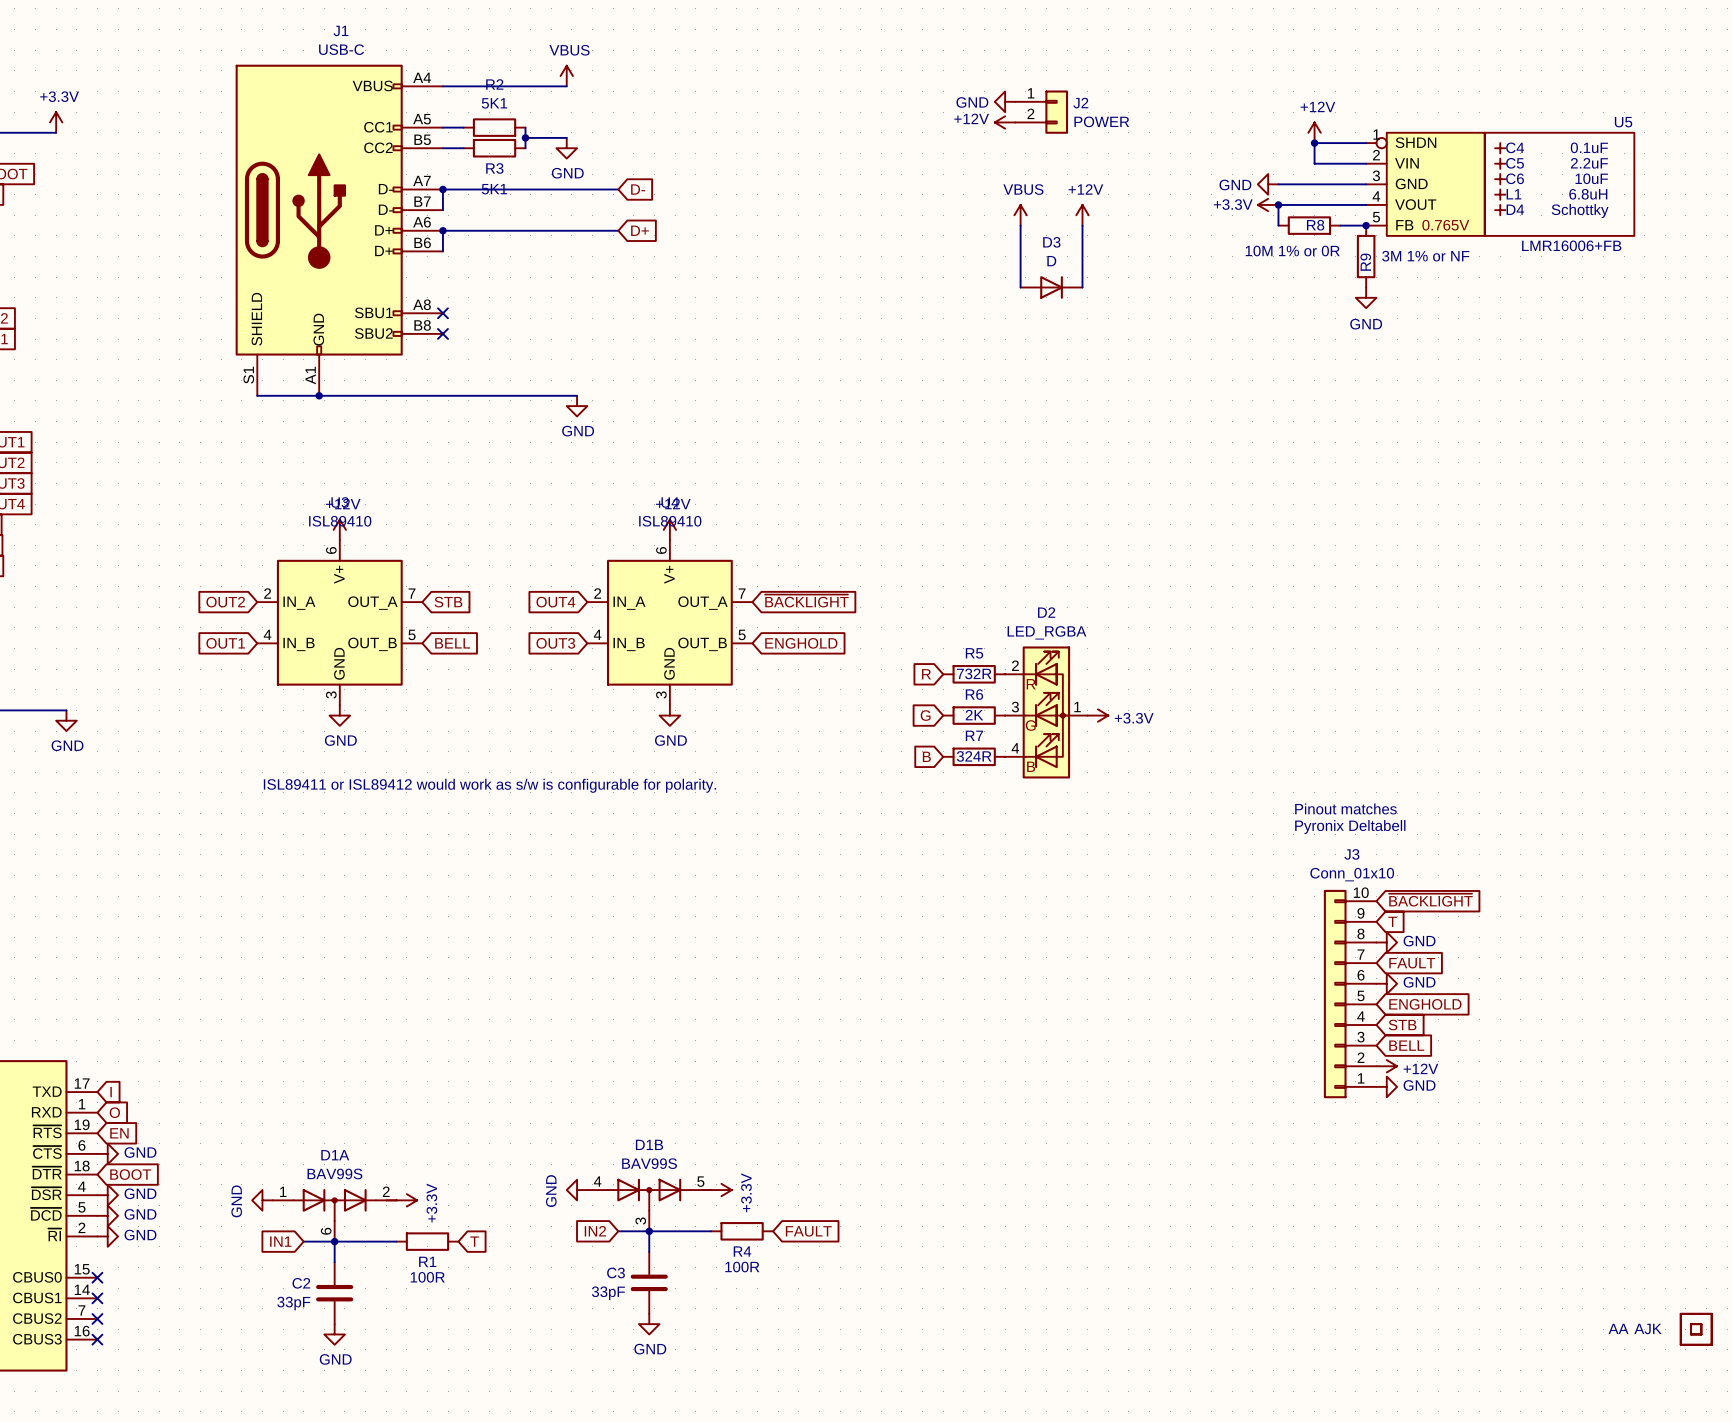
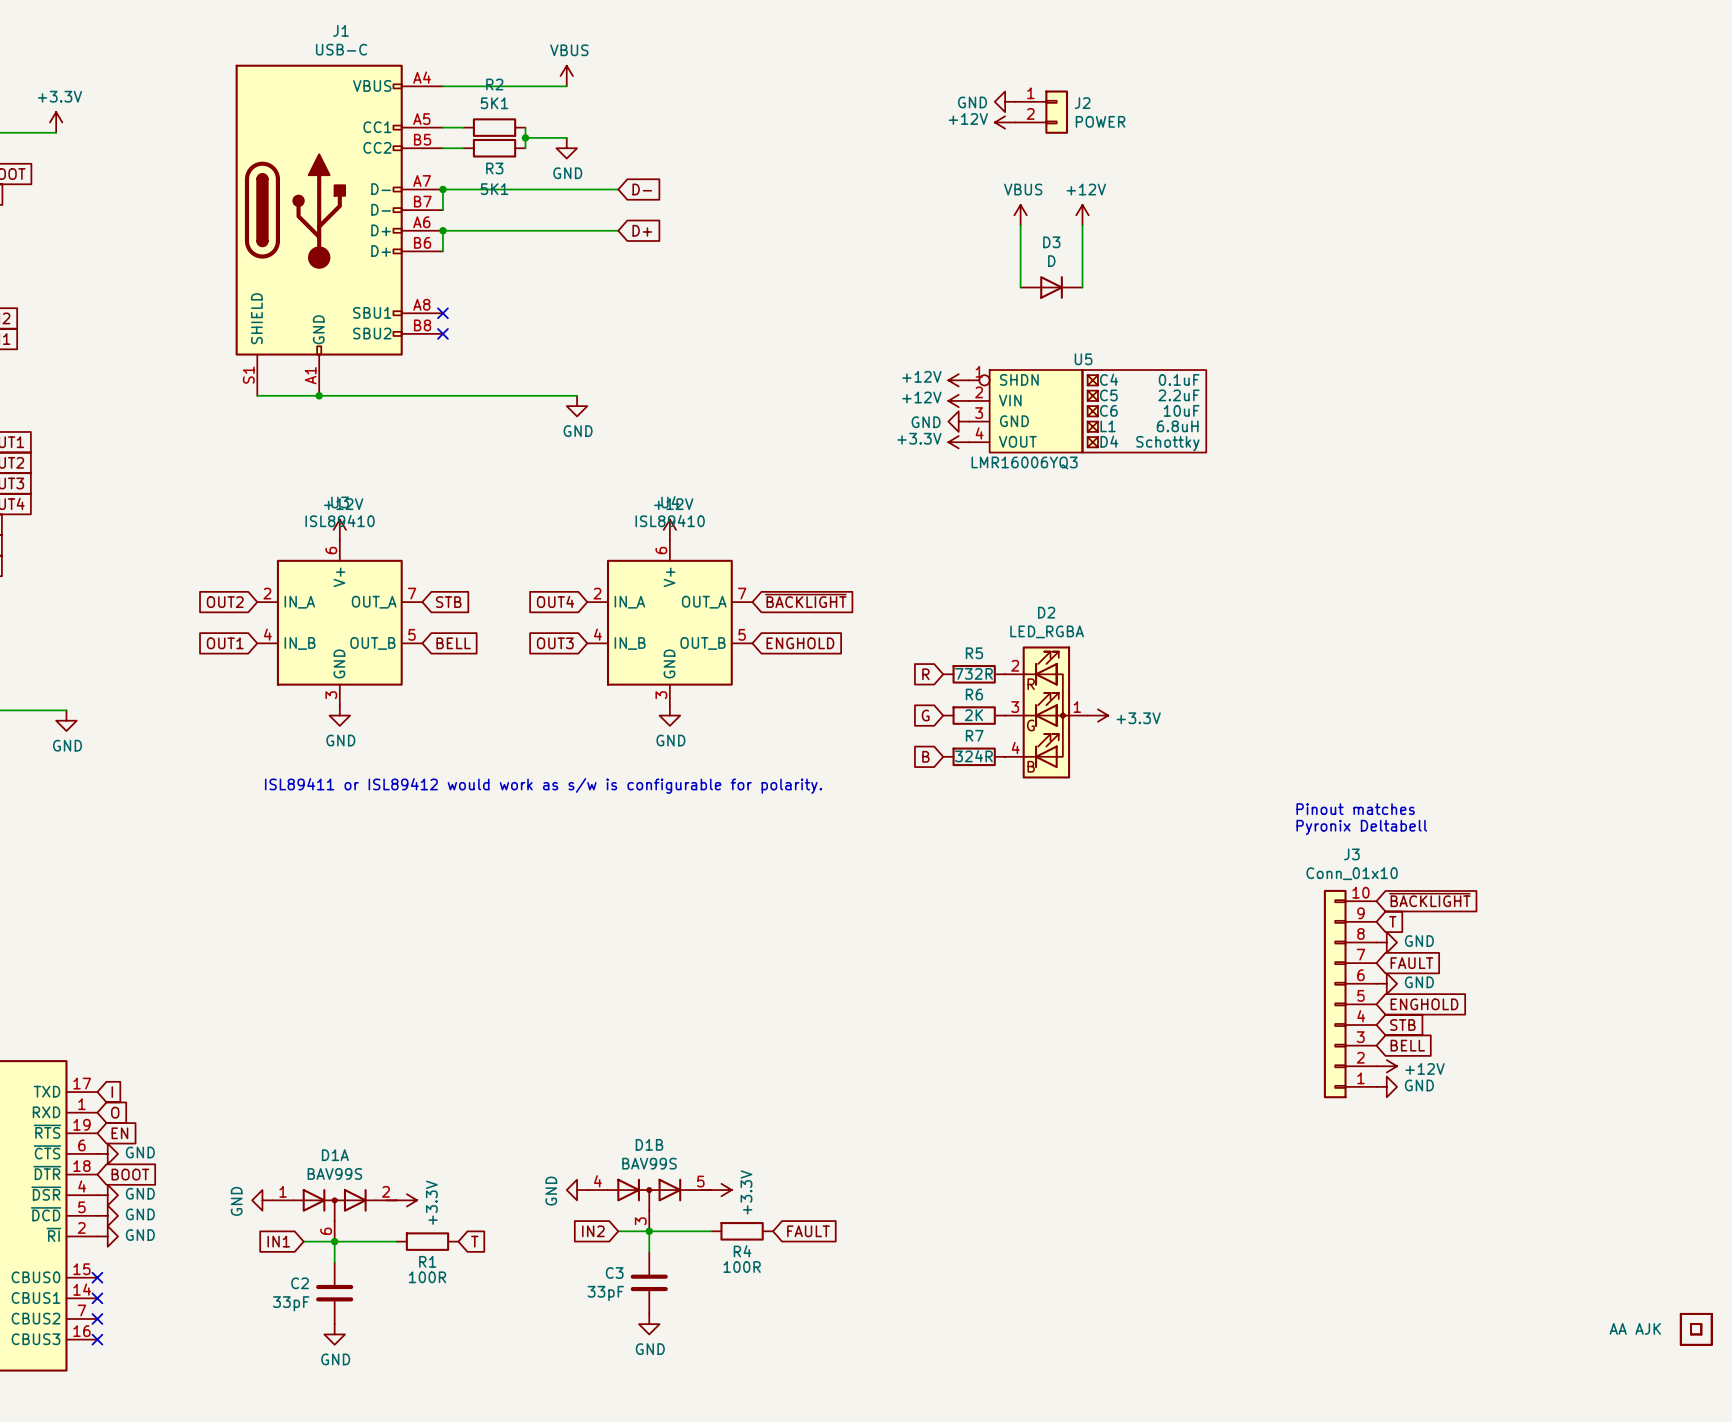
U5 name position: U5 (1623, 122) -> U5 (1083, 359)
power symbol: +12V (1314, 132) -> none
U5 symbol: [1366, 132, 1635, 236] -> [969, 370, 1207, 453]
C4 symbol: [1494, 142, 1507, 155] -> [1087, 374, 1099, 387]
junction: (1314, 143) -> none
wire: (1366, 143) (1314, 143) (1314, 163) (1366, 163) -> none
C5 symbol: [1494, 157, 1507, 170] -> [1087, 390, 1099, 402]
C6 symbol: [1494, 173, 1507, 185] -> [1087, 405, 1099, 418]
power symbol: GND (1268, 184) -> none
wire: (1278, 184) (1366, 184) -> none
L1 symbol: [1494, 188, 1507, 201] -> [1087, 420, 1099, 433]
power symbol: +3.3V (1268, 204) -> none
junction: (1278, 204) -> none
wire: (1366, 204) (1278, 204) (1278, 225) -> none
D4 symbol: [1494, 204, 1507, 216] -> [1087, 436, 1099, 448]
R8: 10M 1% or 0R (1309, 225) -> none
wire: (1340, 225) (1366, 225) -> none
junction: (1366, 225) -> none
U5 value: LMR16006+FB (1571, 245) -> LMR16006YQ3 (1024, 462)
R9: 3M 1% or NF (1366, 256) -> none
power symbol: GND (1366, 297) -> none
power symbol: none -> +12V (958, 380)
power symbol: none -> +12V (958, 400)
power symbol: none -> GND (958, 421)
power symbol: none -> +3.3V (958, 442)

